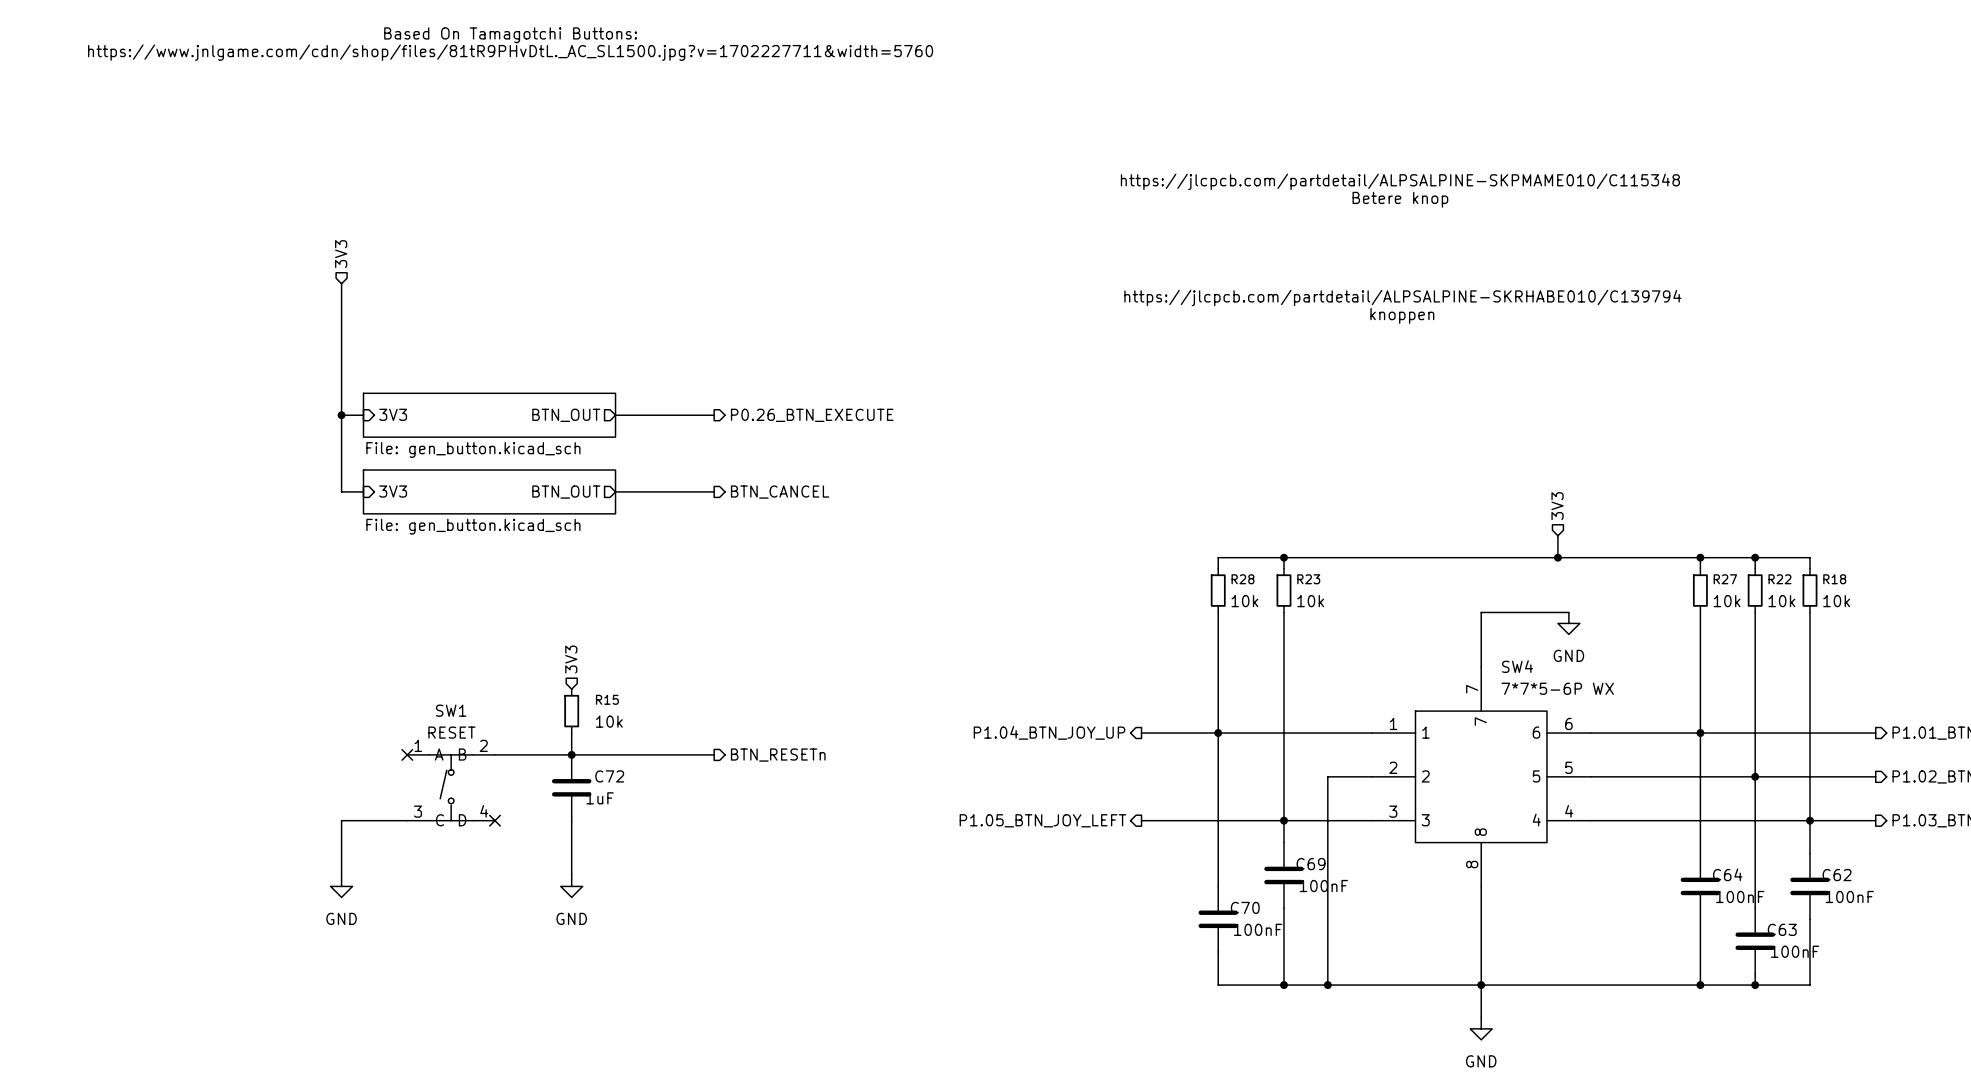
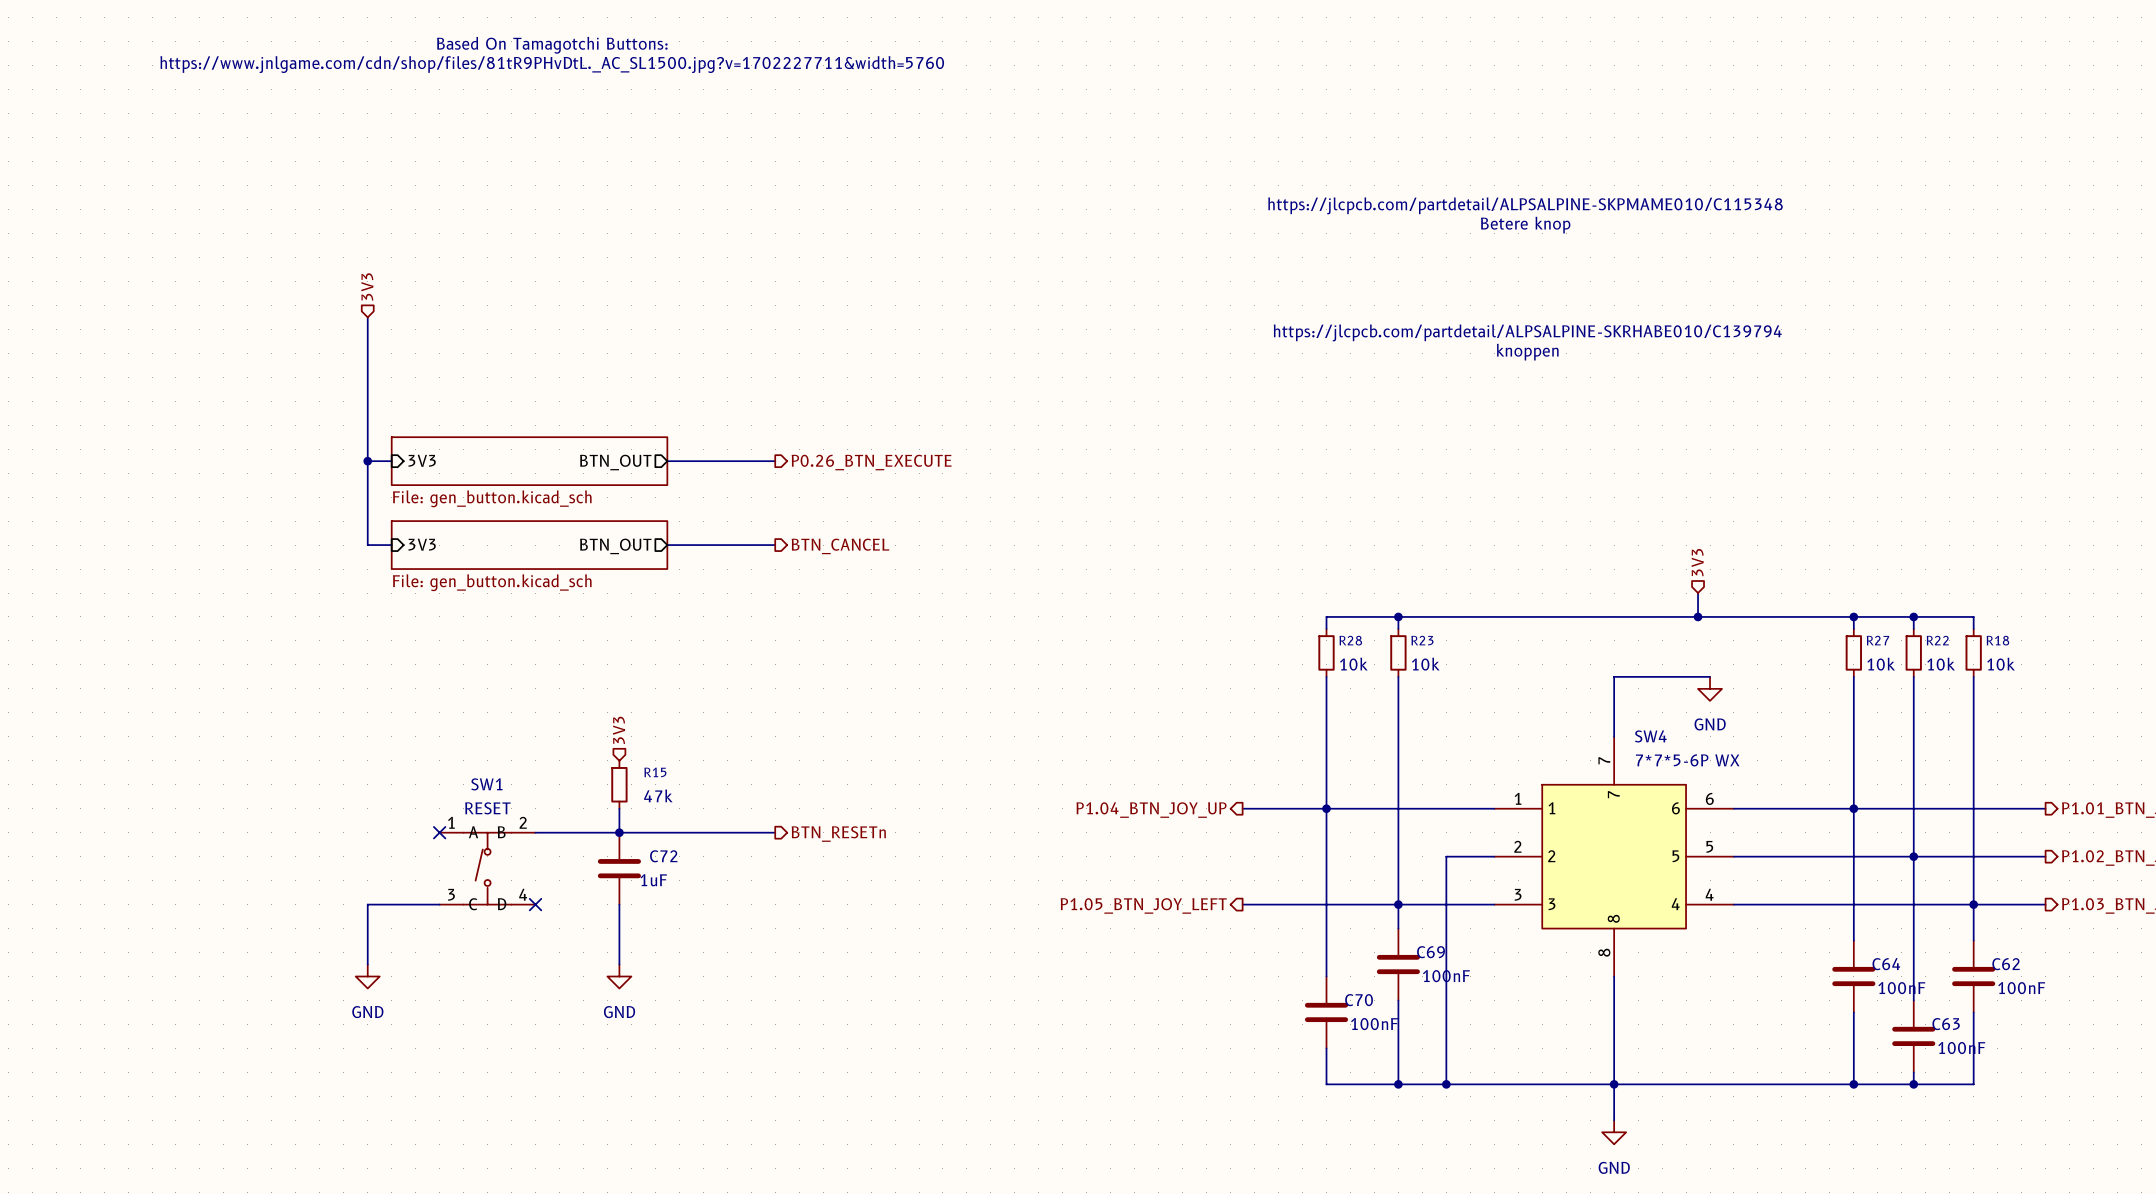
R15 value: 10k (609, 721) -> 47k (658, 795)

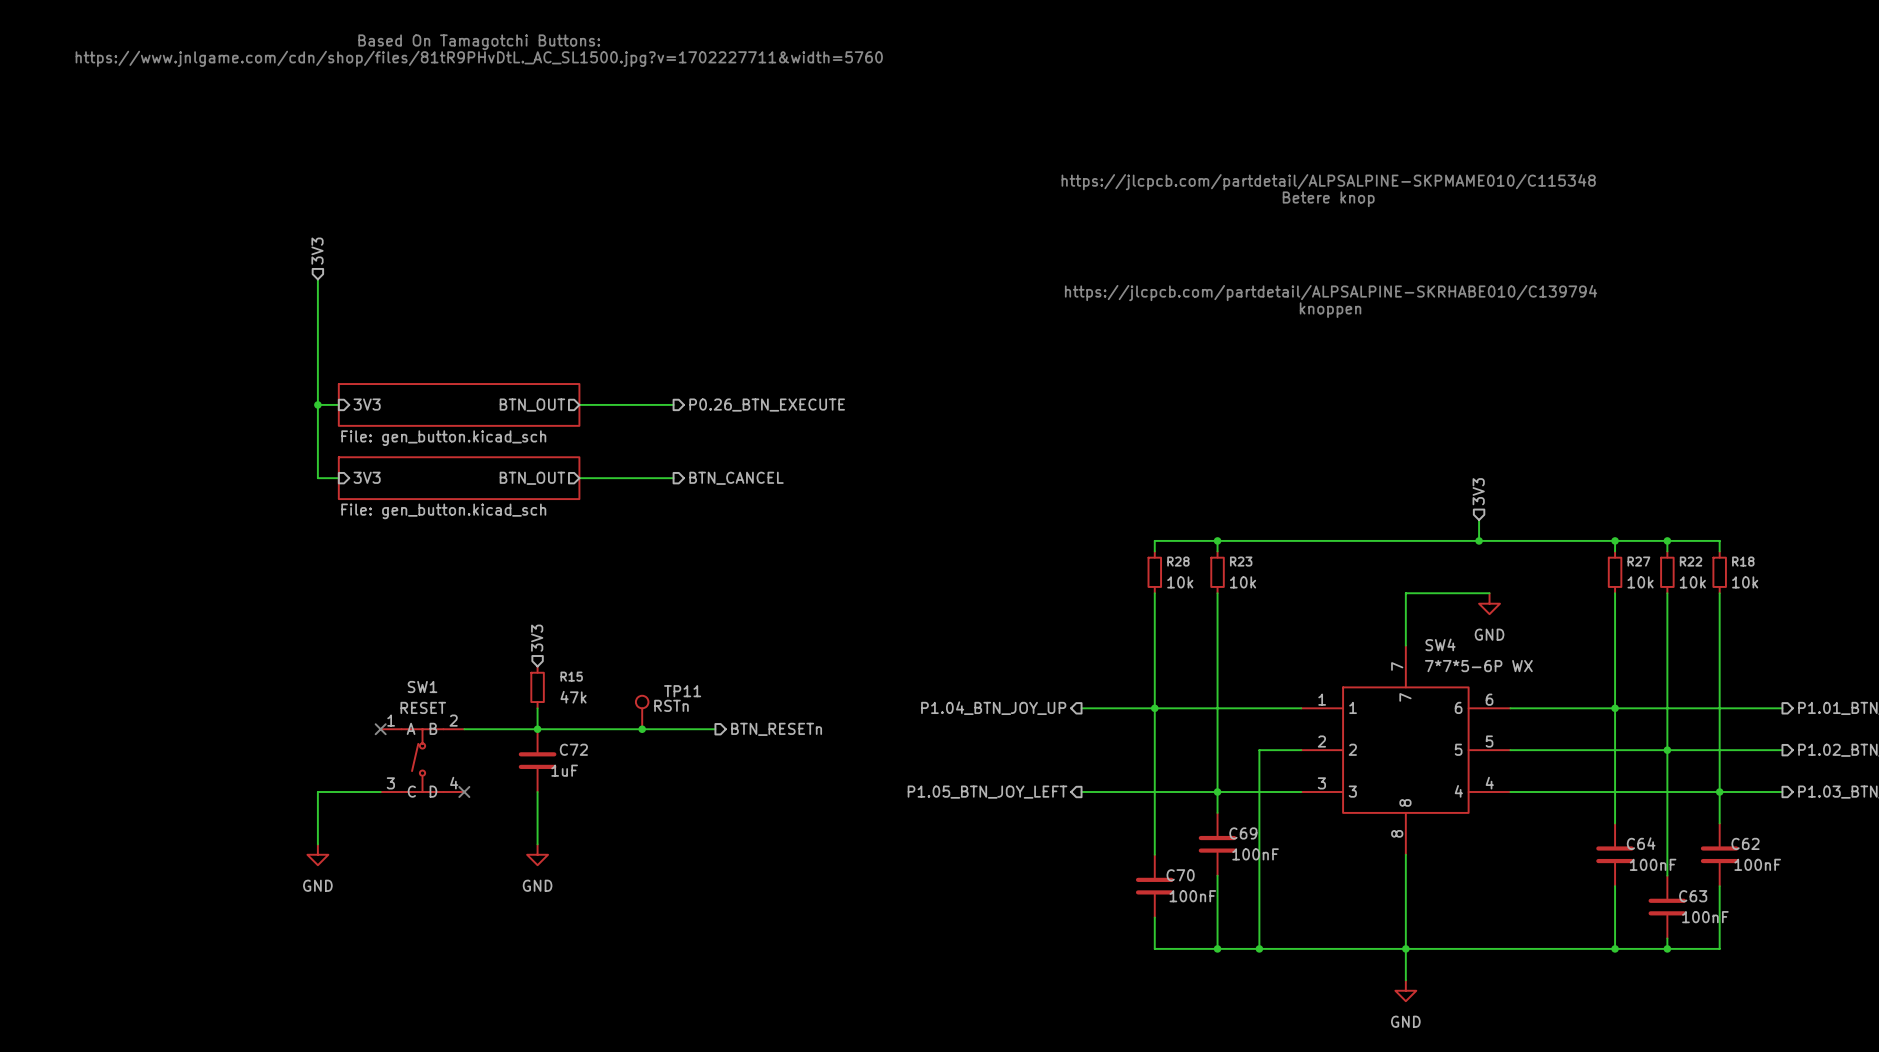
TP11: none -> (642, 712)
junction: none -> (642, 729)
wire: none -> (673, 729) (715, 729)
hierarchical label position: BTN_RESETn (838, 834) -> BTN_RESETn (776, 729)

